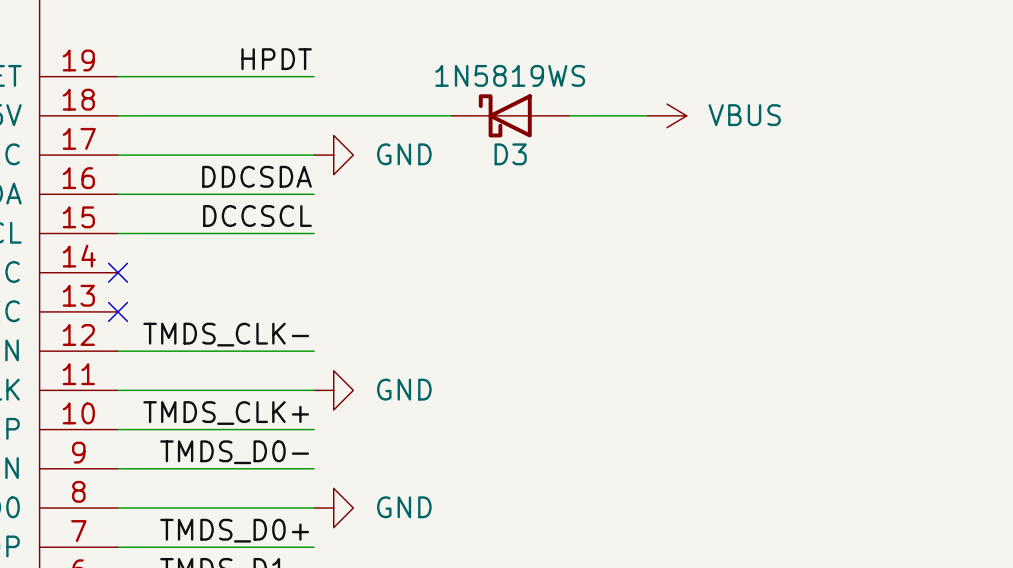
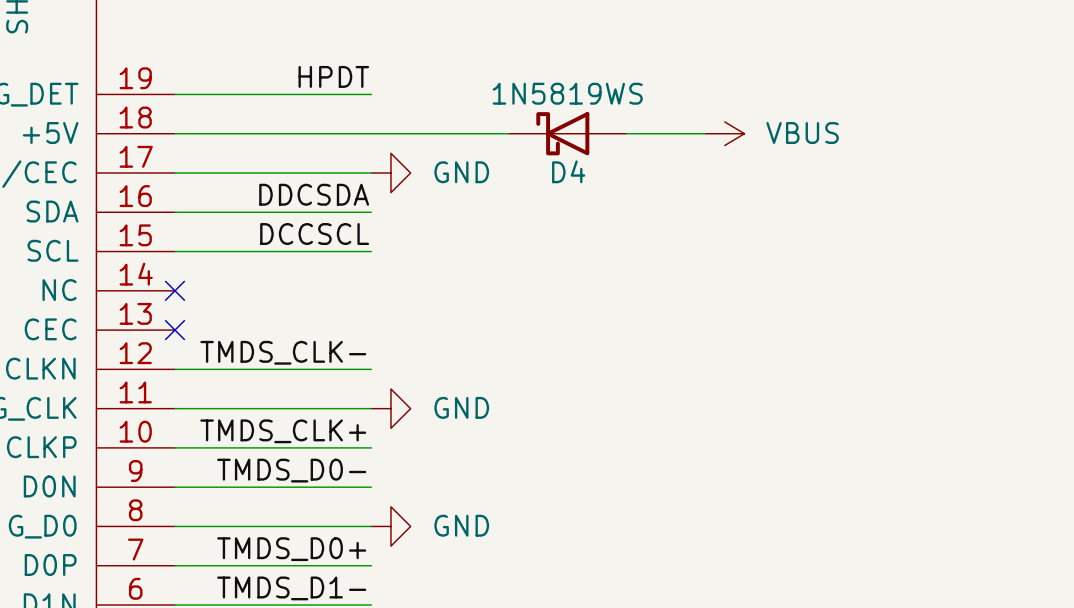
D3 name: D3 (510, 154) -> D4 (568, 171)

